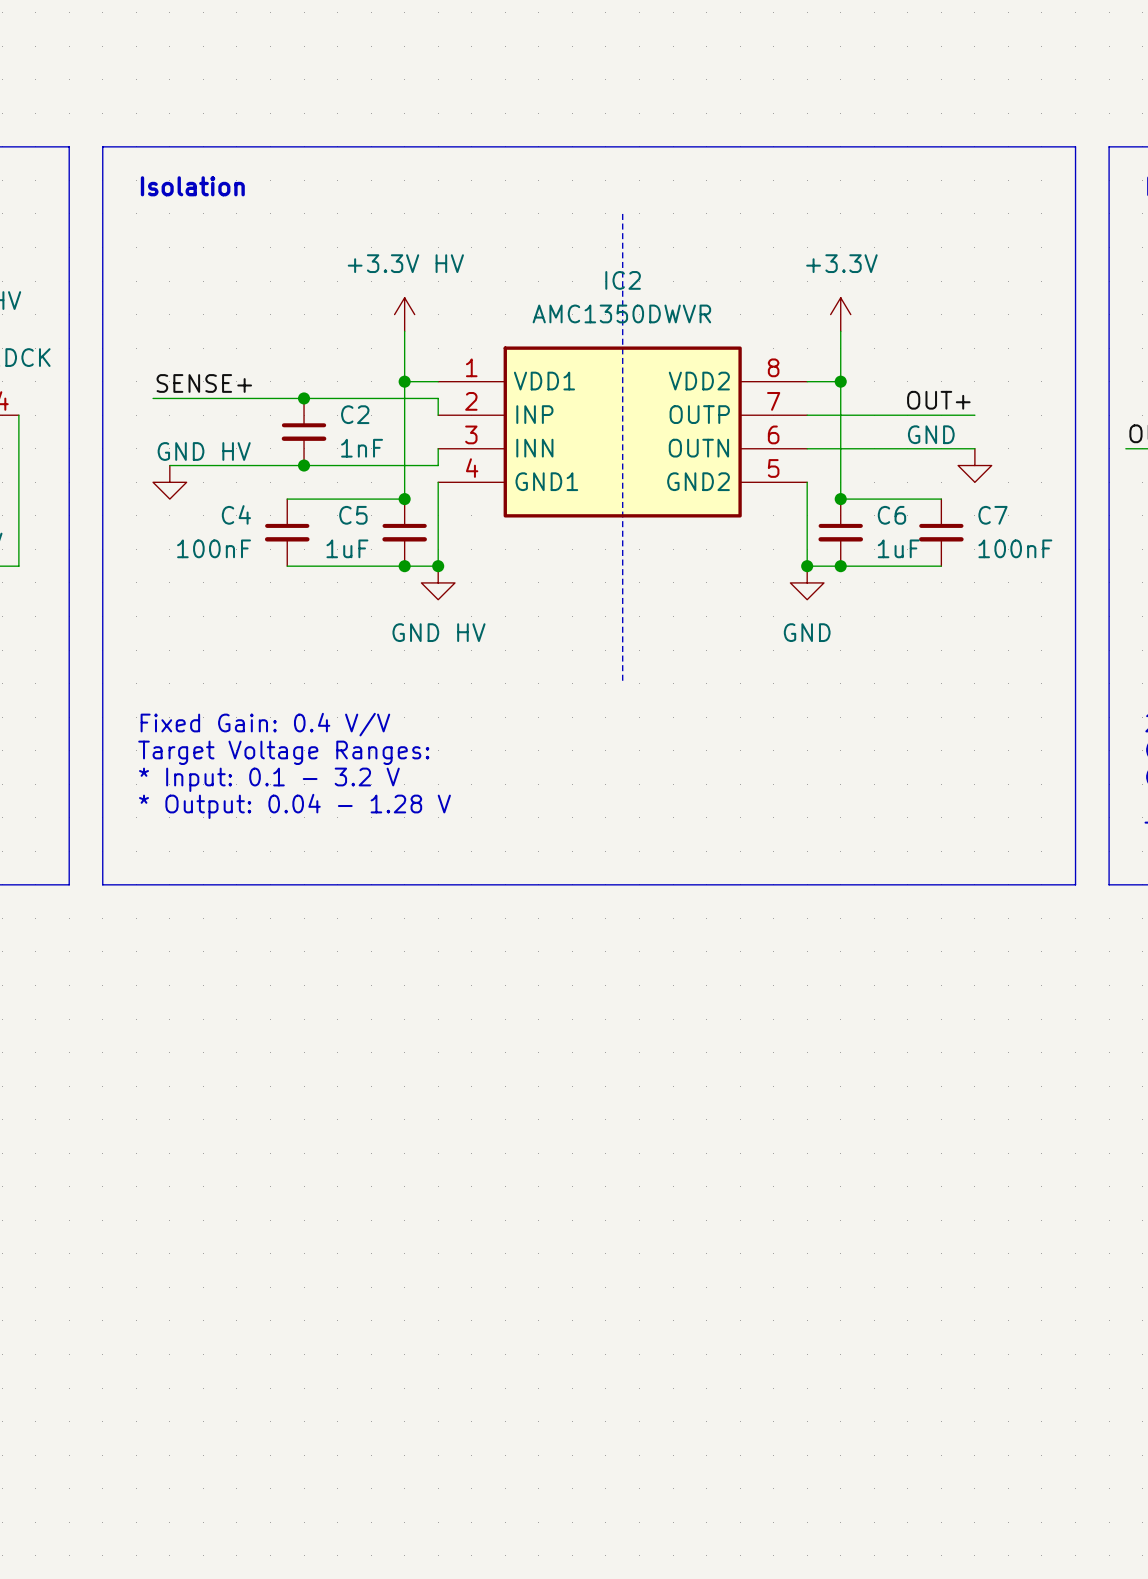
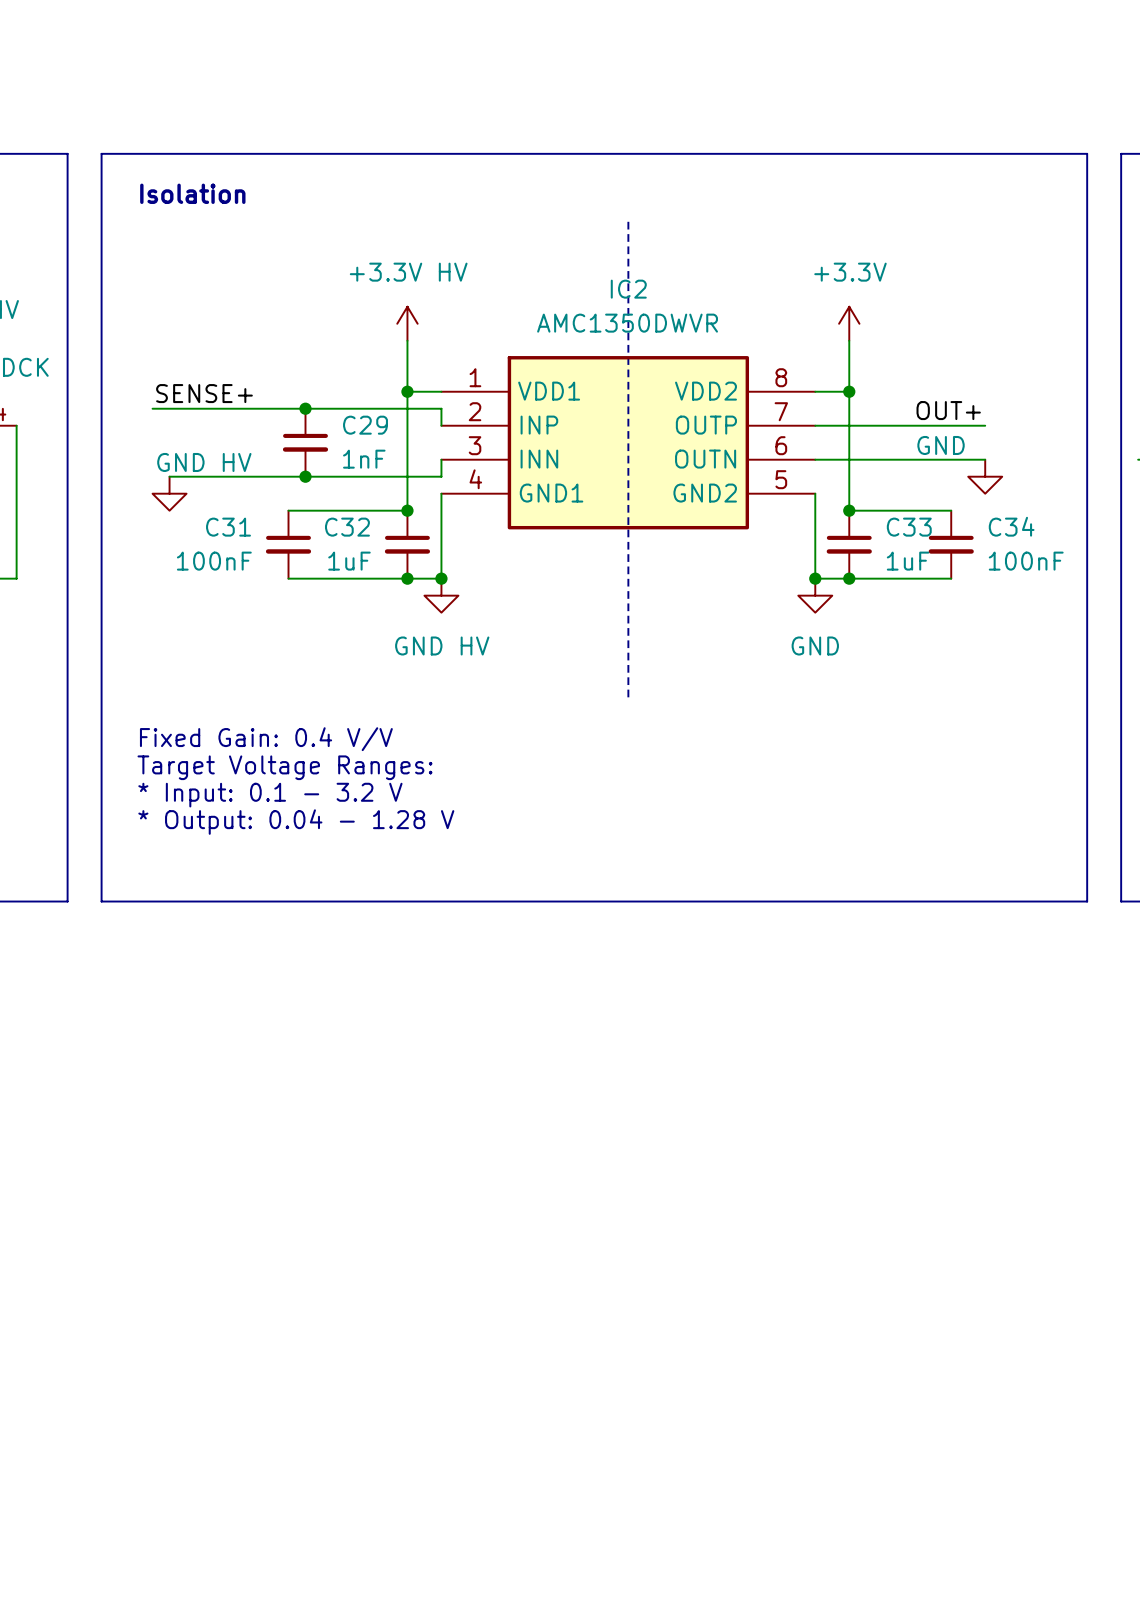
C2 name: C2 (355, 414) -> C29 (365, 425)
C4 name: C4 (236, 514) -> C31 (228, 527)
C5 name: C5 (353, 515) -> C32 (347, 527)
C6 name: C6 (891, 515) -> C33 (909, 527)
C7 name: C7 (993, 515) -> C34 (1011, 526)

